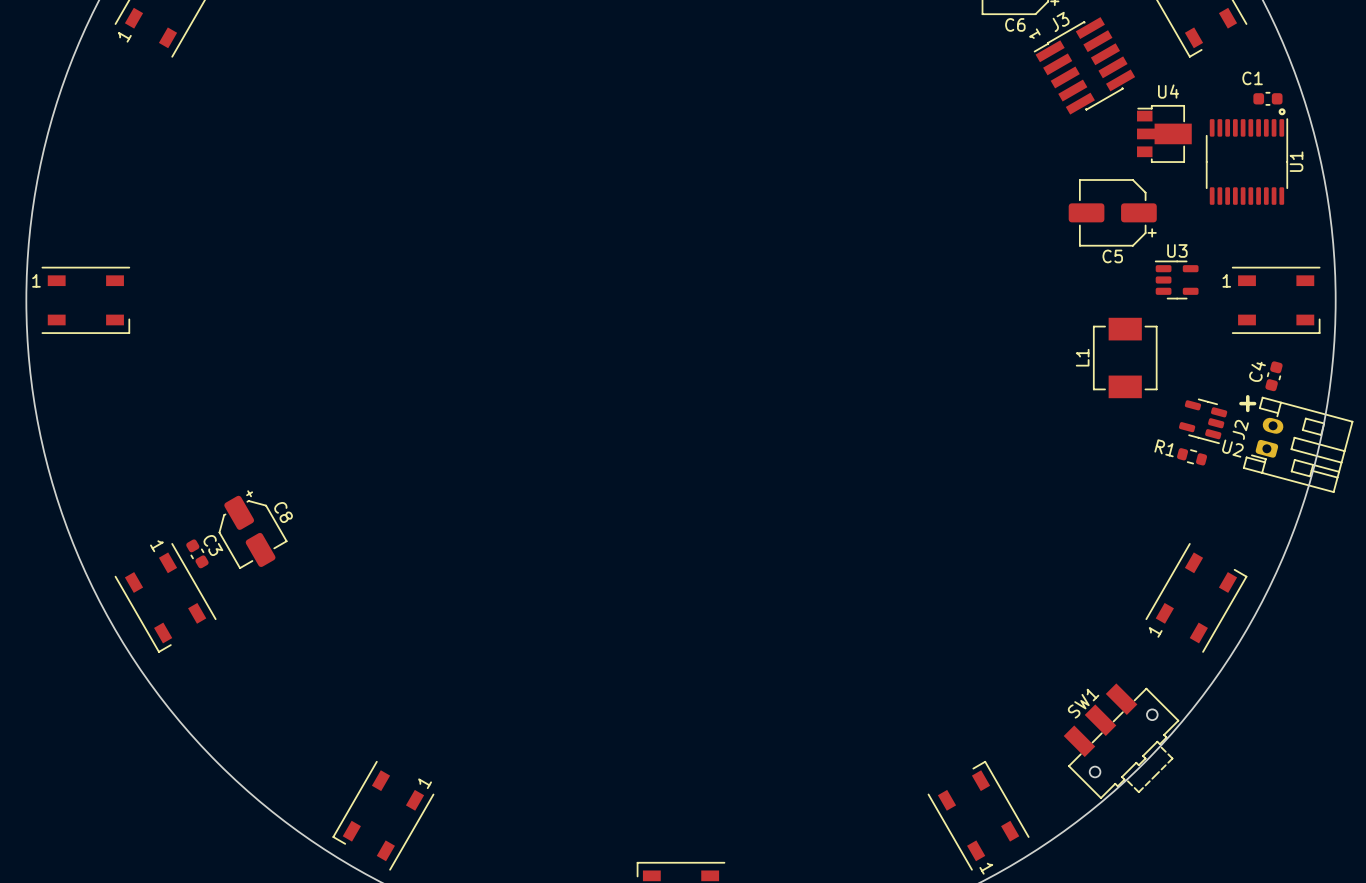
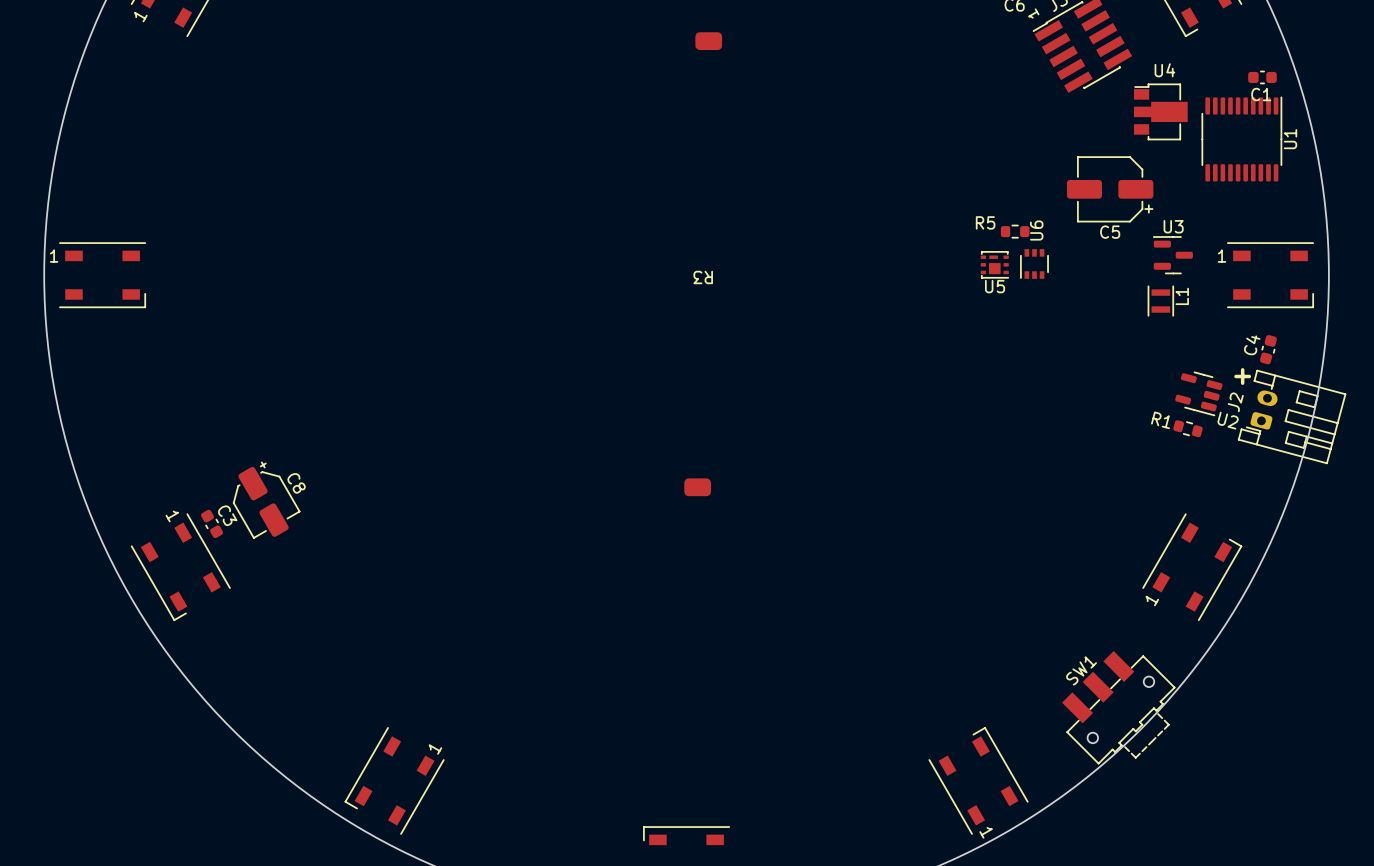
C1 name position: C1 (1252, 78) -> C1 (1261, 94)
drawing: [1278, 108, 1286, 116] -> none
R5: none -> (1015, 231)
U3 footprint: [1154, 260, 1199, 300] -> [1153, 236, 1193, 275]
U6: none -> (1034, 263)
R3: none -> (703, 264)
U5: none -> (994, 264)
L1 footprint: [1093, 317, 1158, 399] -> [1147, 285, 1174, 317]
L1 name position: L1 (1082, 357) -> L1 (1182, 296)

